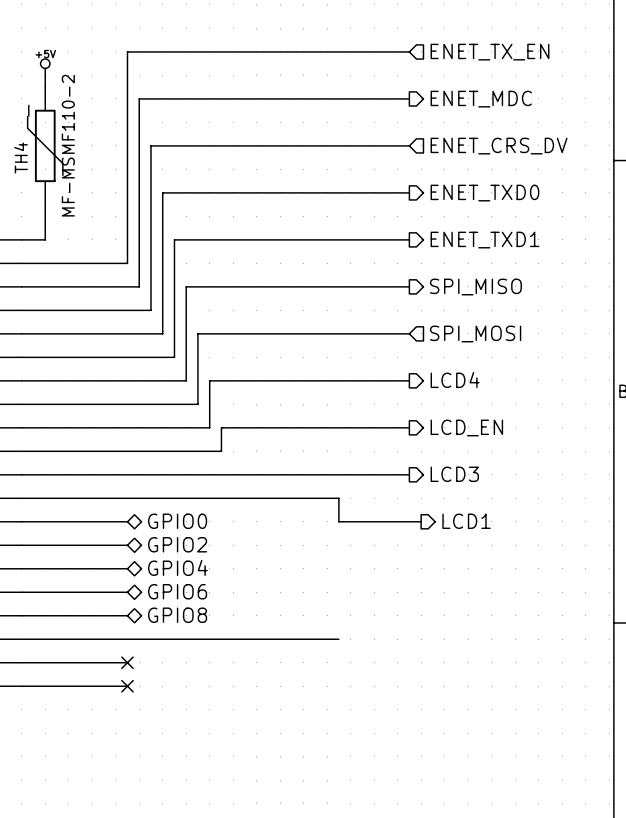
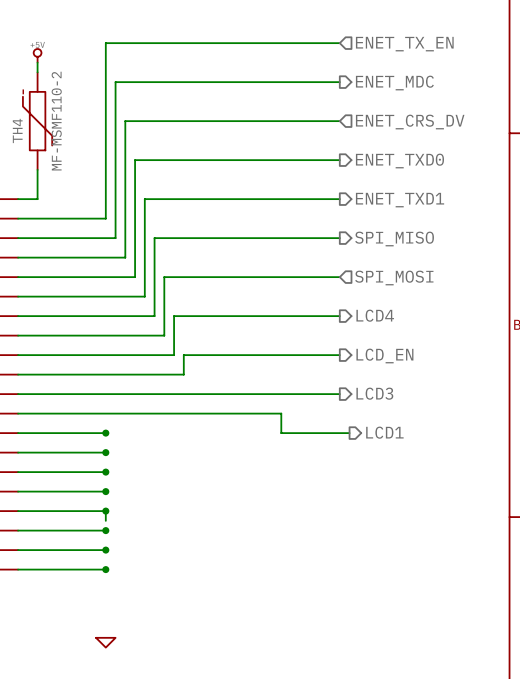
junction: none -> (105, 433)
hierarchical label: GPIO0 (177, 521) -> none
hierarchical label: GPIO2 (177, 544) -> none
junction: none -> (105, 452)
hierarchical label: GPIO4 (177, 567) -> none
junction: none -> (105, 472)
hierarchical label: GPIO6 (177, 591) -> none
junction: none -> (105, 491)
wire: none -> (105, 511) (105, 520)
junction: none -> (105, 511)
hierarchical label: GPIO8 (177, 615) -> none
wire: (127, 639) (338, 639) -> none
junction: none -> (105, 530)
no-connect mark: (127, 662) -> none
junction: none -> (105, 550)
no-connect mark: (127, 686) -> none
junction: none -> (105, 569)
power symbol: none -> (105, 642)

